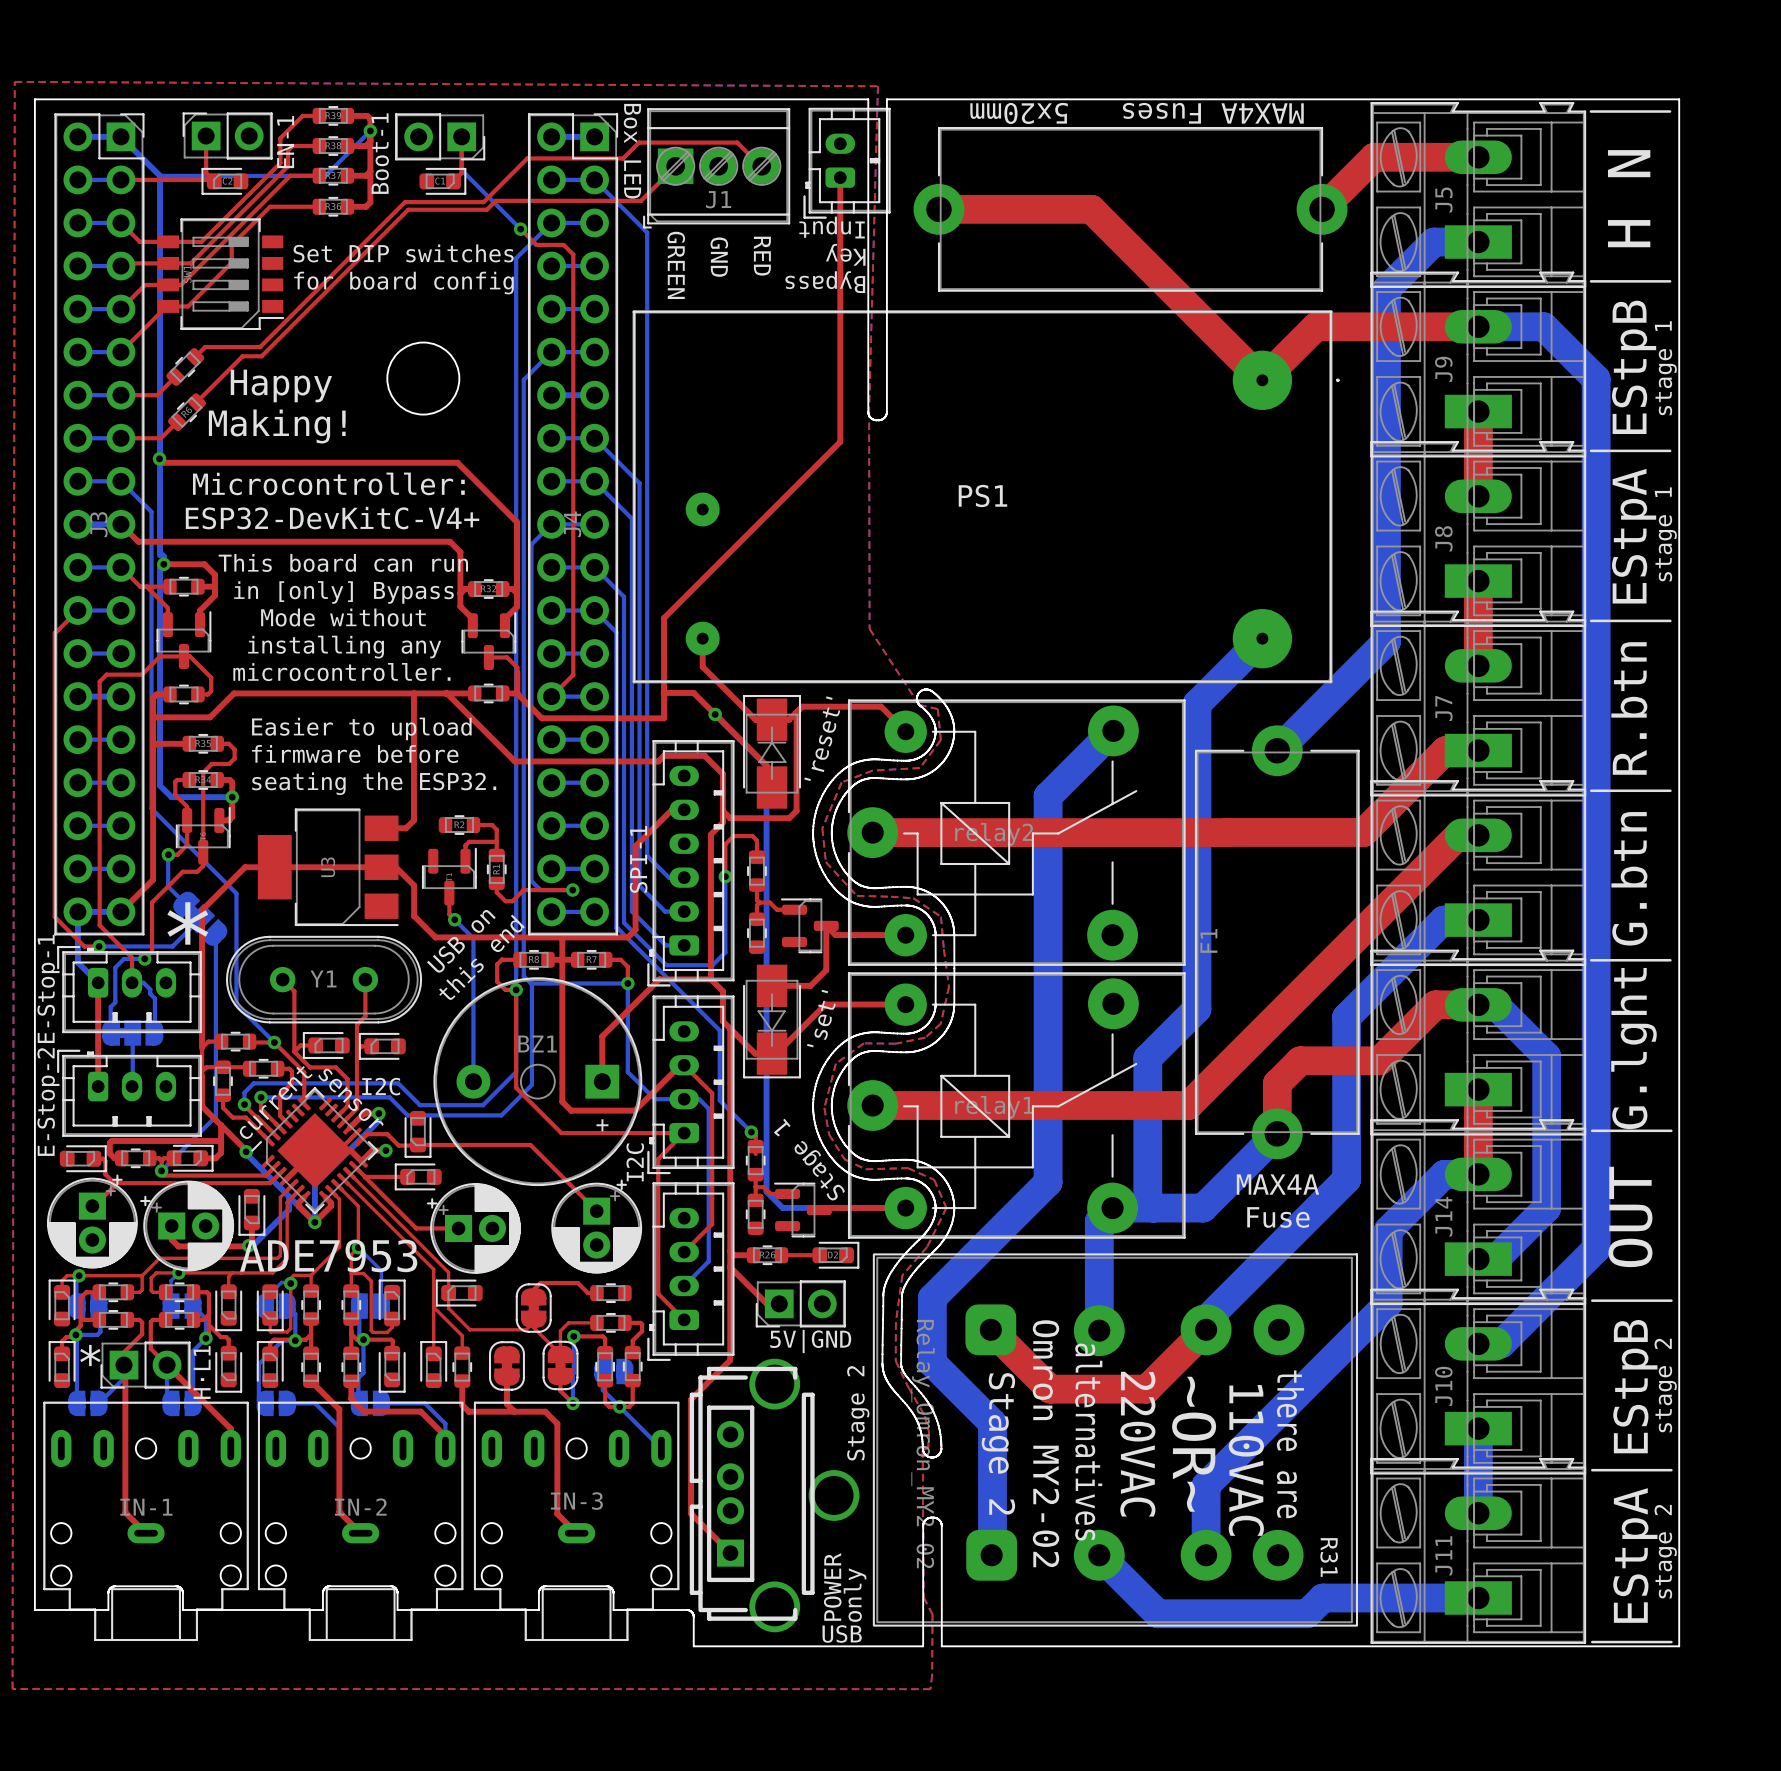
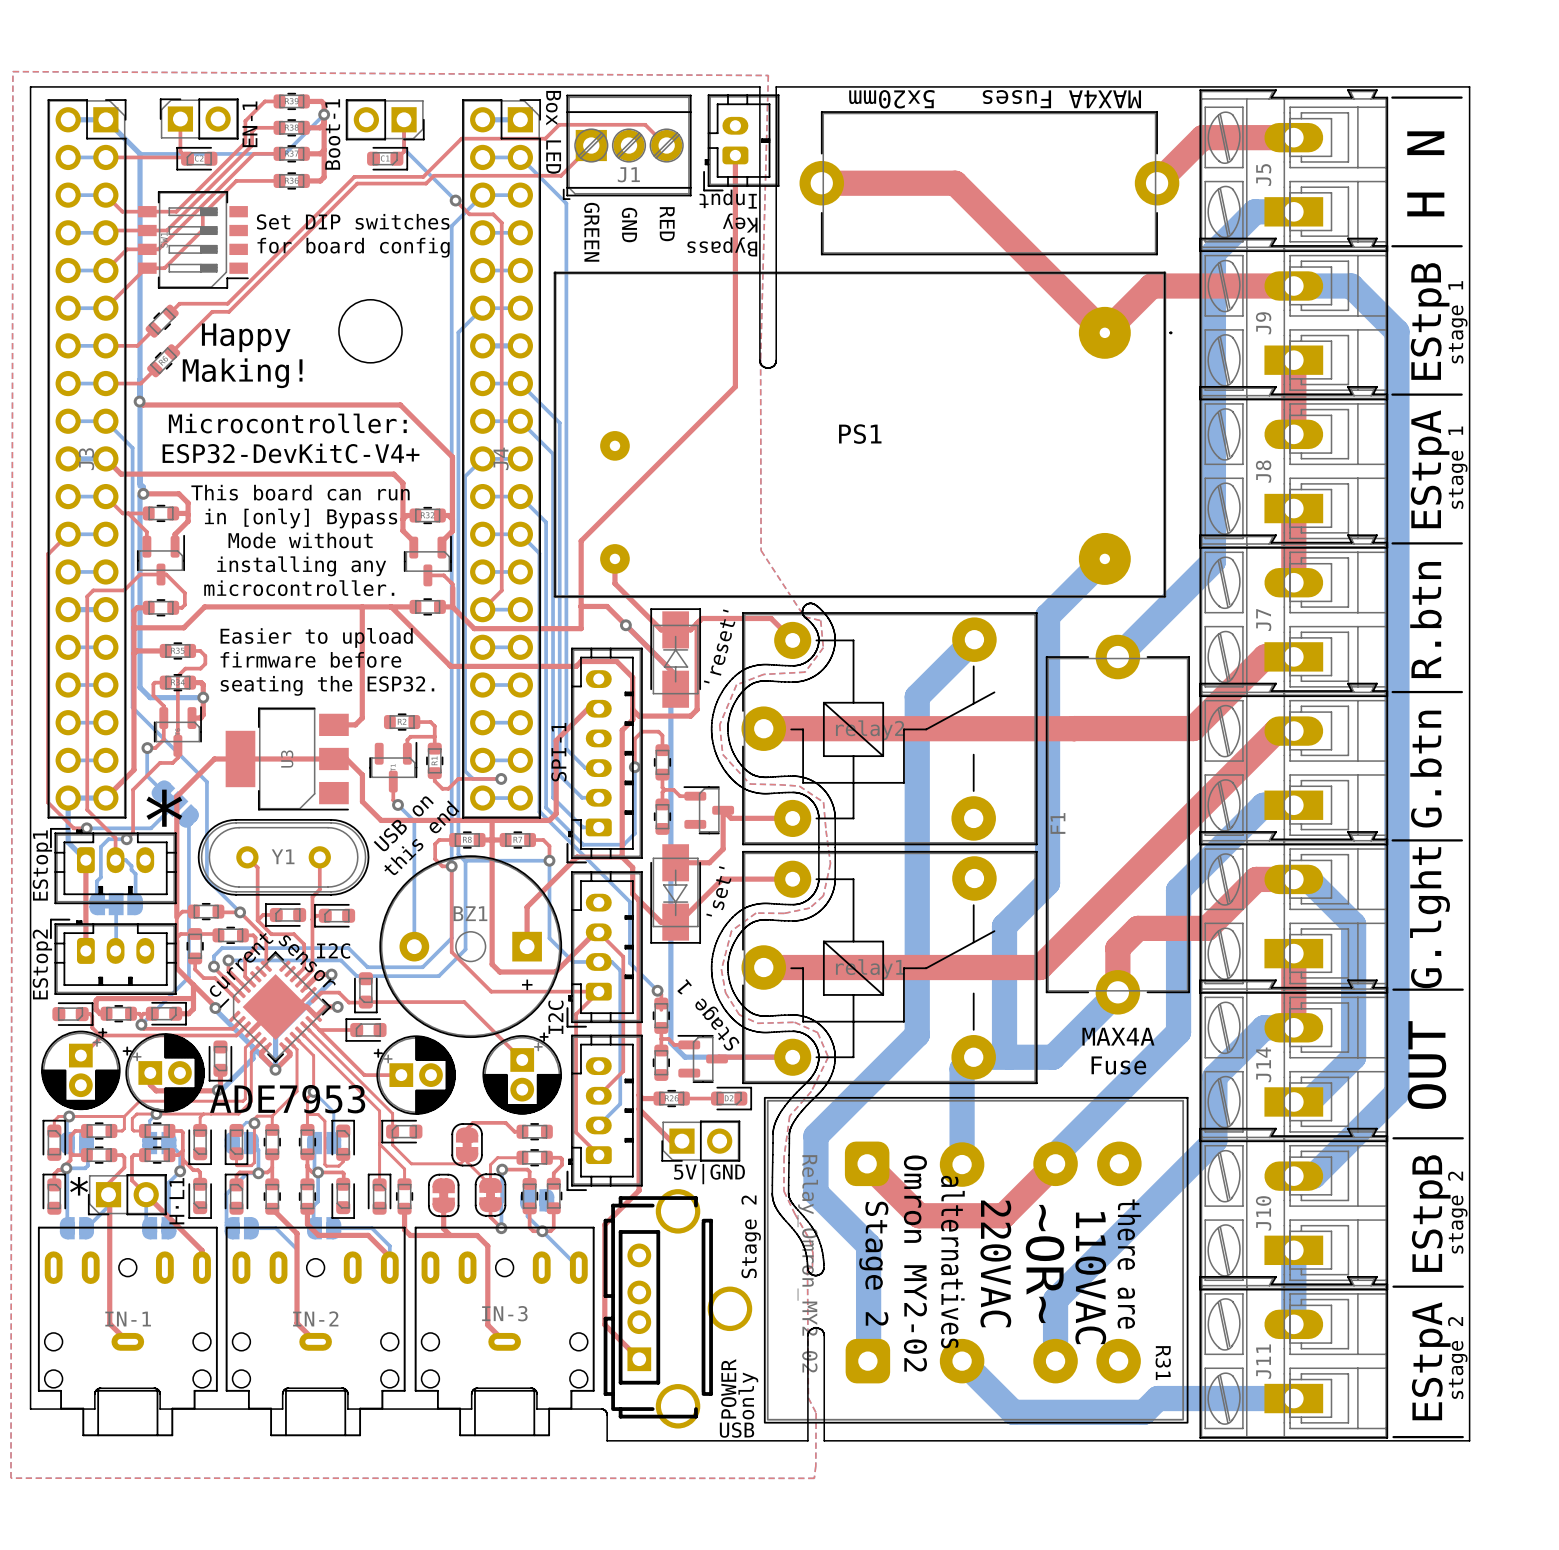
E-Stop-1 name: E-Stop-1 (48, 988) -> EStop1 (42, 865)
E-Stop-2 name: E-Stop-2 (48, 1102) -> EStop2 (42, 964)

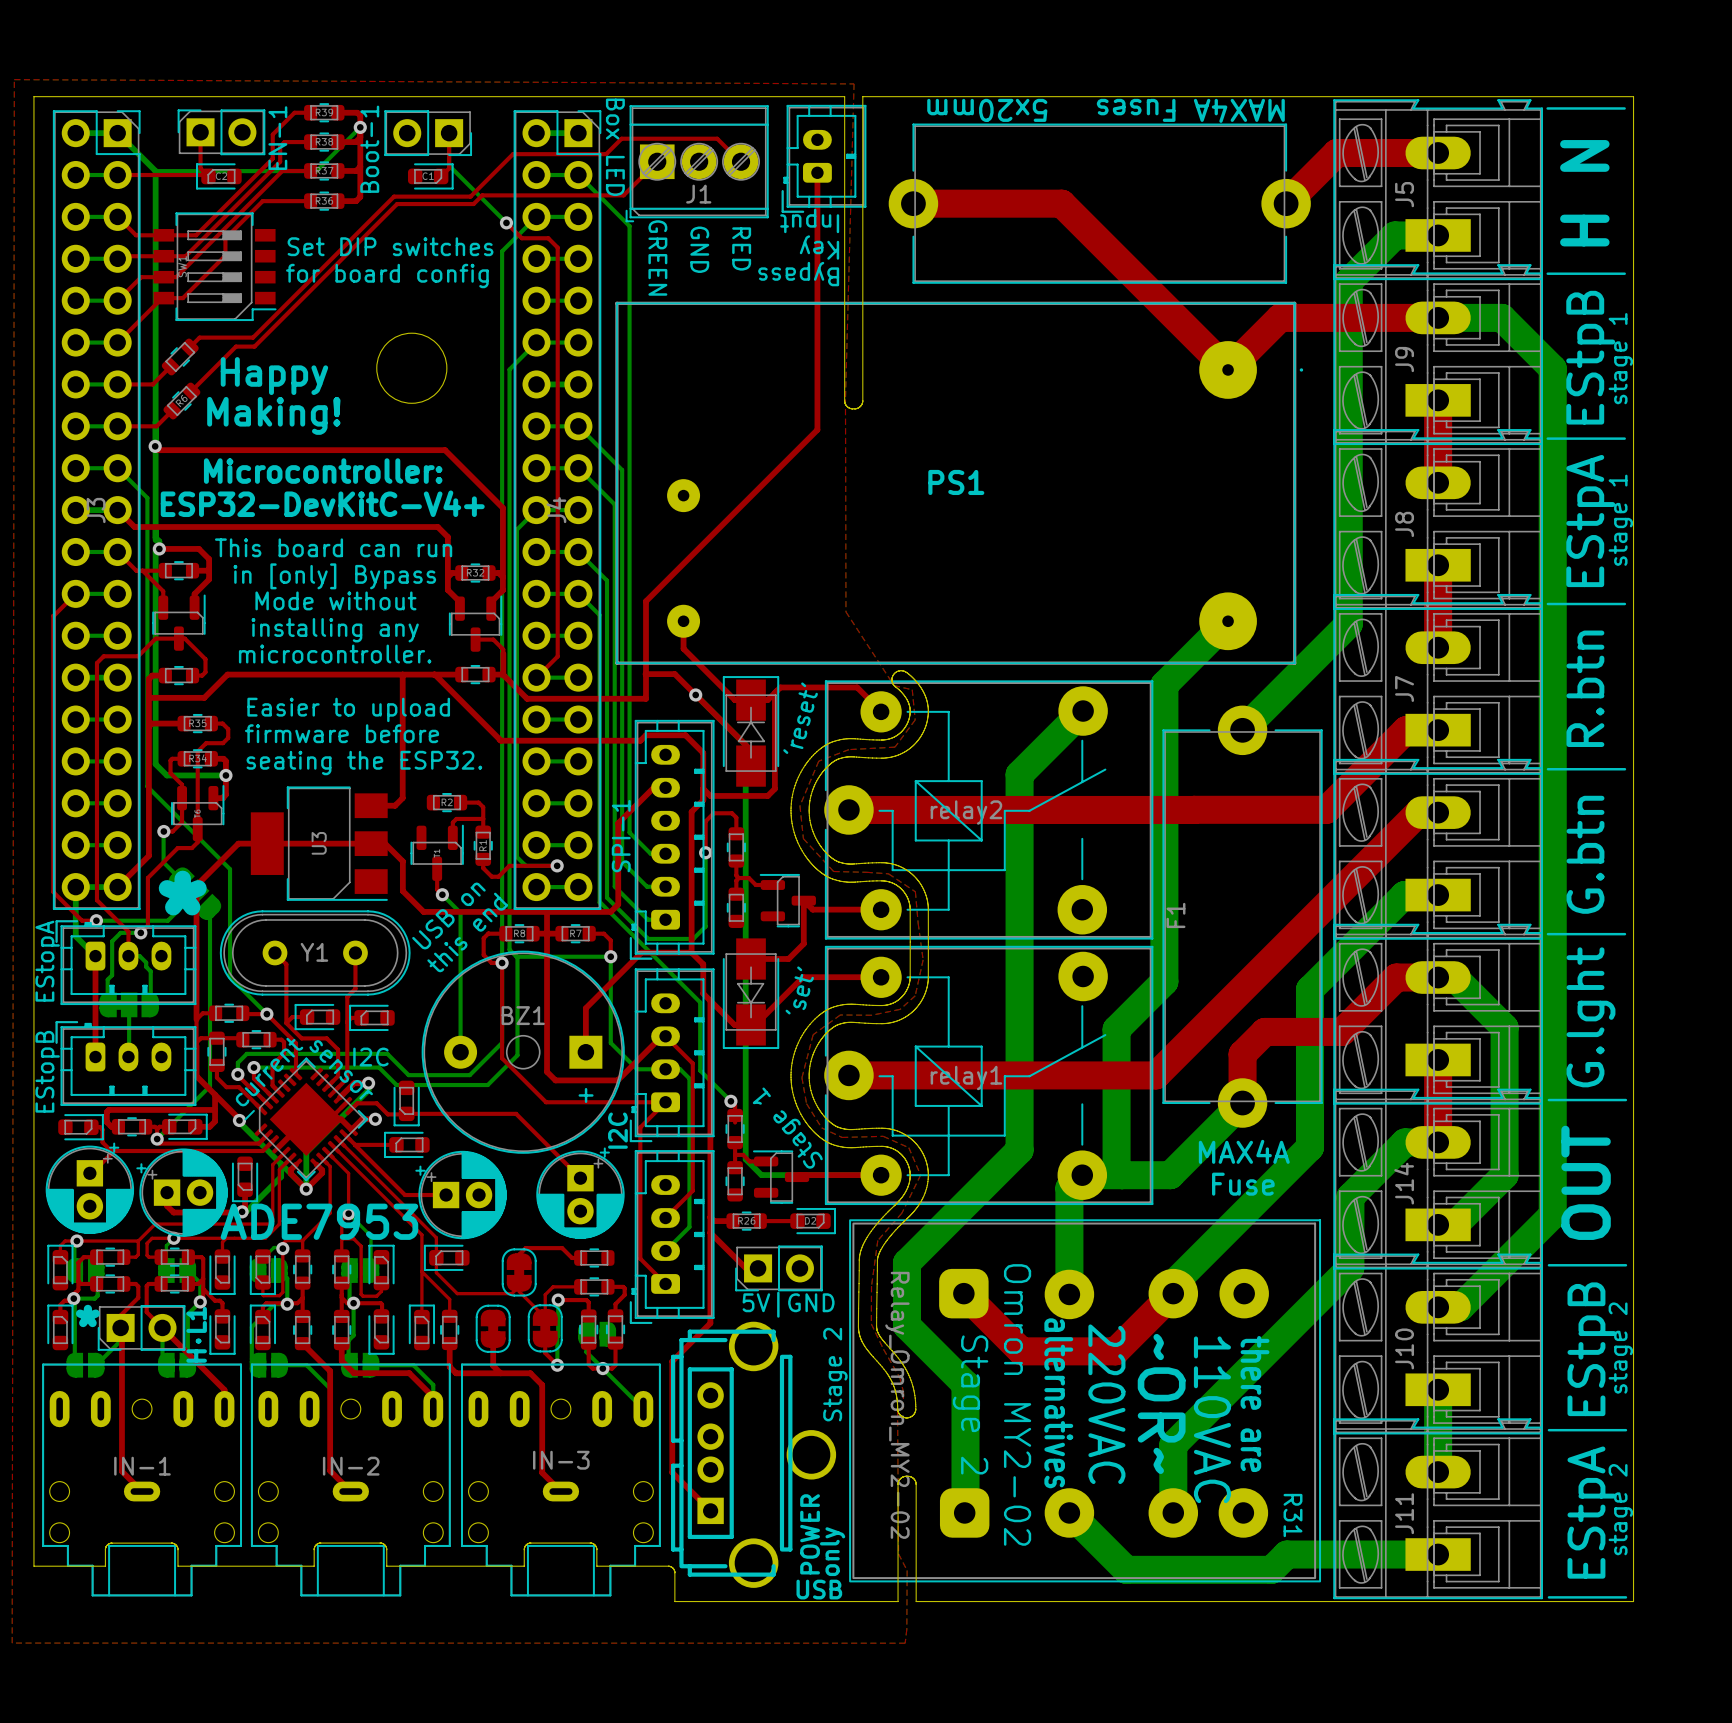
EStop1 name: EStop1 (42, 865) -> EStopA (47, 961)
EStop2 name: EStop2 (42, 964) -> EStopB (47, 1071)

